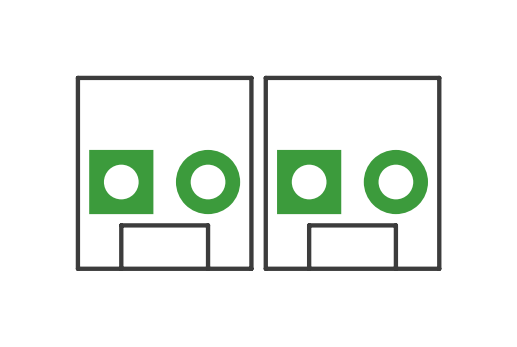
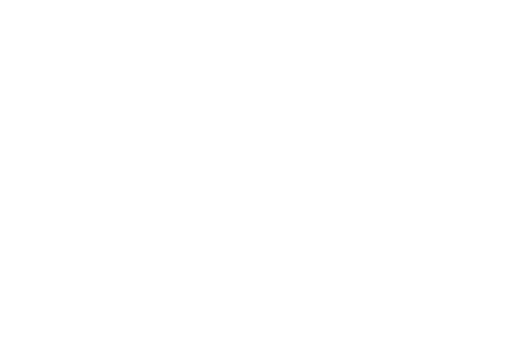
part: (164, 173) -> none
part: (352, 173) -> none

